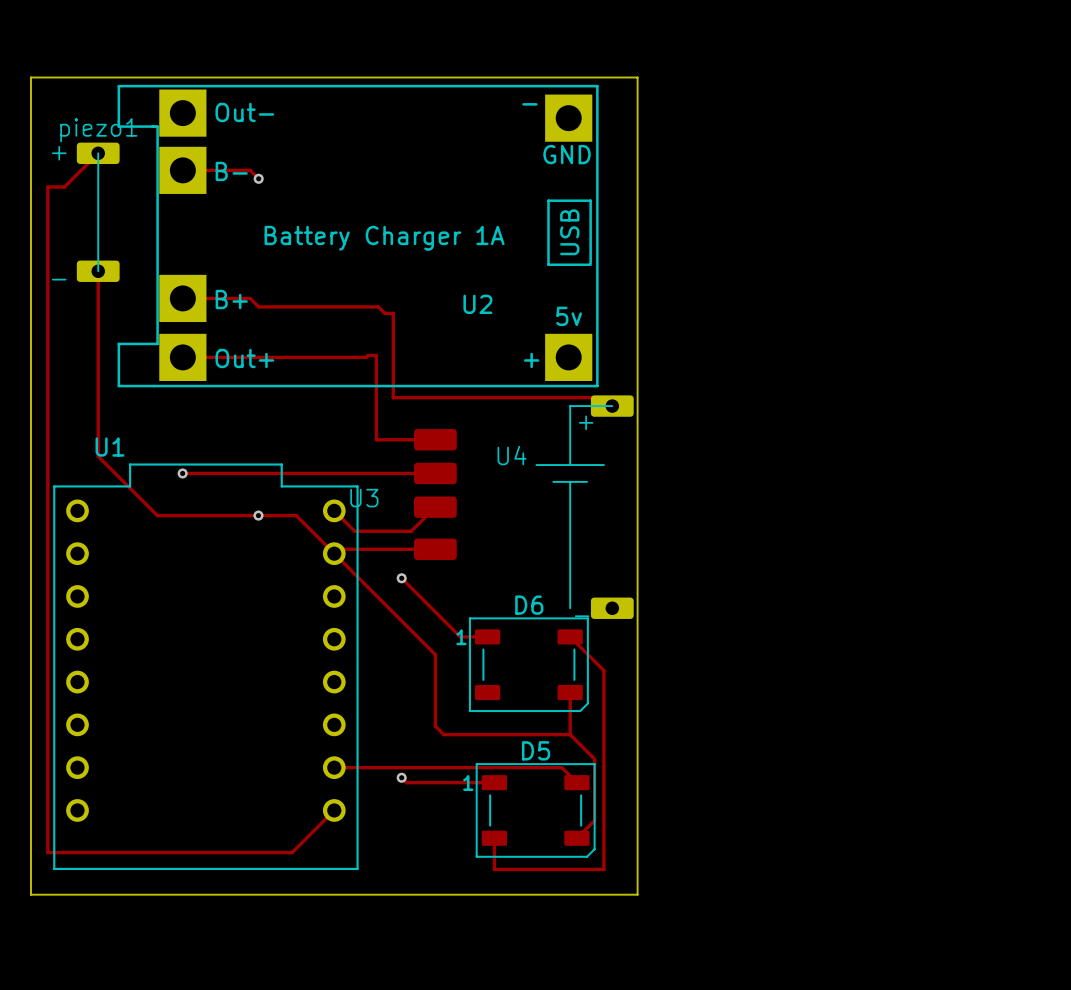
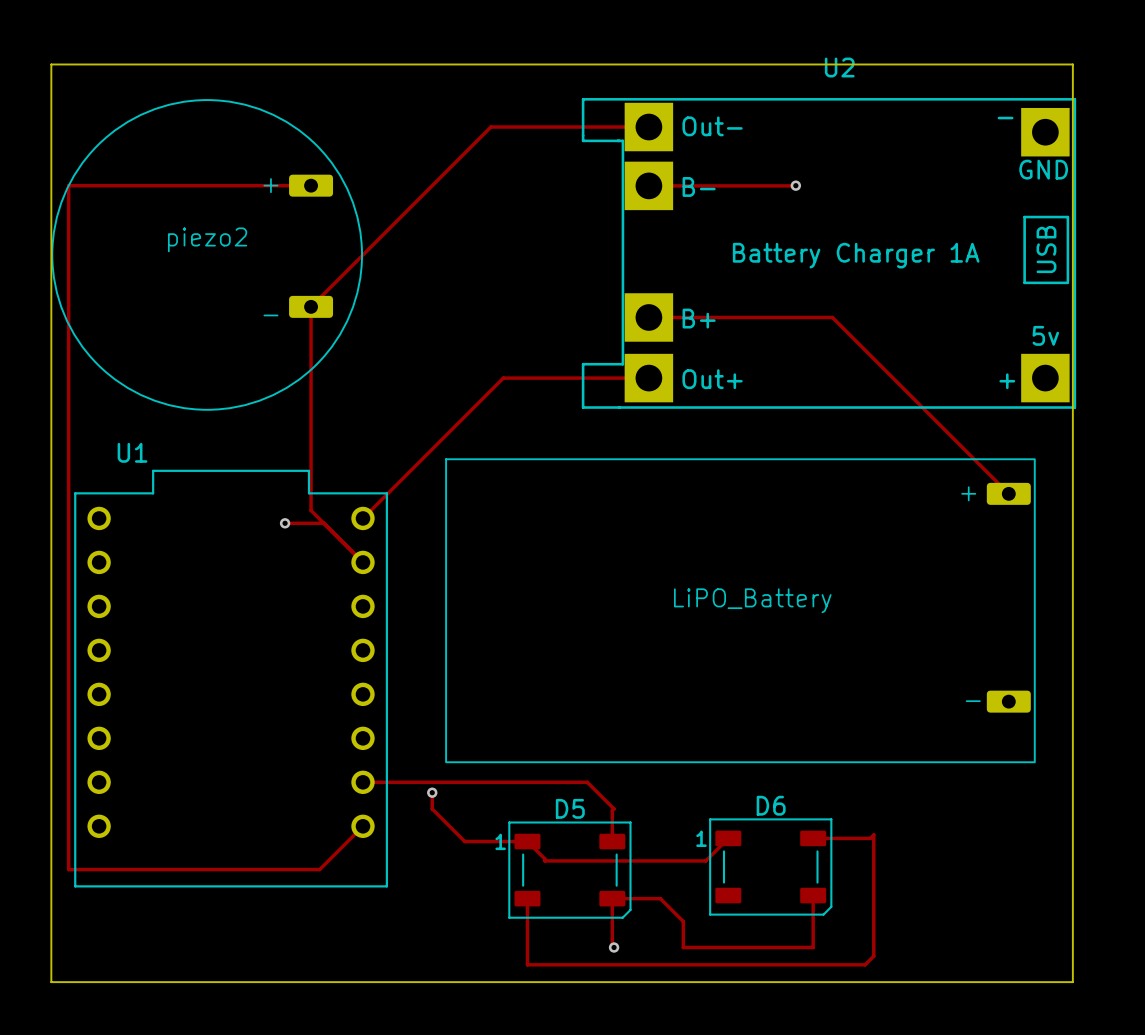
board edge: (31, 77) (637, 77) (637, 894) (31, 894) -> (51, 73) (51, 64) (1072, 64) (1072, 982) (51, 982) (51, 912)
track: none -> (648, 127) (490, 127) (311, 306) (311, 510) (323, 523)
track: (98, 153) (64, 187) -> (311, 185) (85, 185)
track: (182, 170) (250, 170) (258, 178) -> none
via: (258, 178) -> none
track: none -> (648, 185) (795, 185)
via: none -> (795, 185)
piezo1: (98, 212) -> none
U2 position: (358, 236) -> (828, 253)
piezo2: none -> (207, 254)
track: (98, 278) (98, 456) (157, 515) (258, 515) -> none
track: (182, 298) (250, 298) (258, 306) (378, 306) (384, 313) (393, 313) (393, 397) (603, 397) (612, 406) -> none
U2 name position: U2 (477, 304) -> U2 (839, 67)
track: none -> (648, 317) (832, 317) (1008, 493)
track: (182, 357) (366, 357) (368, 355) (376, 355) (376, 439) (435, 439) -> none
track: (182, 473) (435, 473) -> none
via: (182, 473) -> none
U4: (435, 494) -> none
track: (435, 507) (411, 531) (354, 531) (334, 510) -> (648, 378) (503, 378) (362, 518)
U3: (584, 507) -> none
track: (339, 548) (435, 549) (435, 557) -> none
track: (334, 553) (435, 654) (435, 726) (443, 734) (570, 734) -> none
track: (401, 578) (460, 636) (487, 636) -> none
via: (401, 578) -> none
LiPO_Battery: none -> (740, 610)
track: (570, 636) (603, 670) (603, 869) (494, 869) (494, 838) -> none
D6 position: (528, 664) -> (770, 866)
track: (570, 692) (570, 734) -> none
track: (570, 734) (594, 759) (594, 820) (576, 838) -> none
track: (552, 767) (561, 767) (576, 782) -> (587, 782) (614, 808) (612, 810) (612, 841)
track: (401, 777) (406, 782) (494, 782) -> (432, 792) (432, 808) (464, 841) (527, 841) (544, 860) (705, 860) (728, 838)
D5 position: (535, 810) -> (569, 870)
track: none -> (813, 838) (870, 838) (873, 834) (873, 956) (865, 964) (527, 964) (527, 898)
track: none -> (813, 895) (813, 947) (683, 947) (683, 921) (660, 898) (612, 898) (612, 945) (614, 947)
via: none -> (614, 947)

